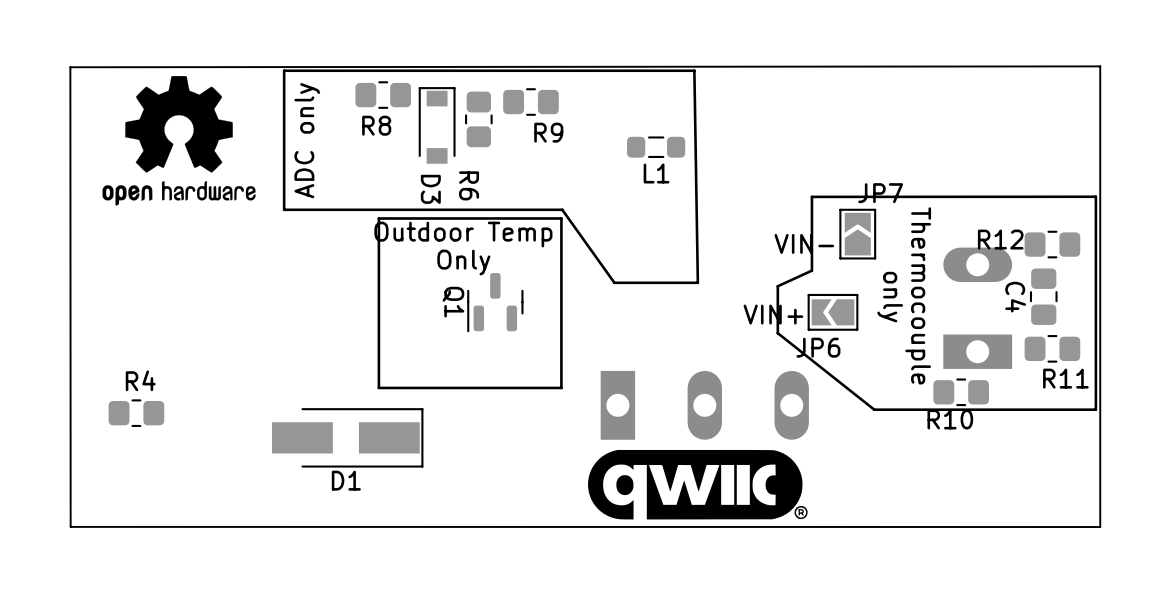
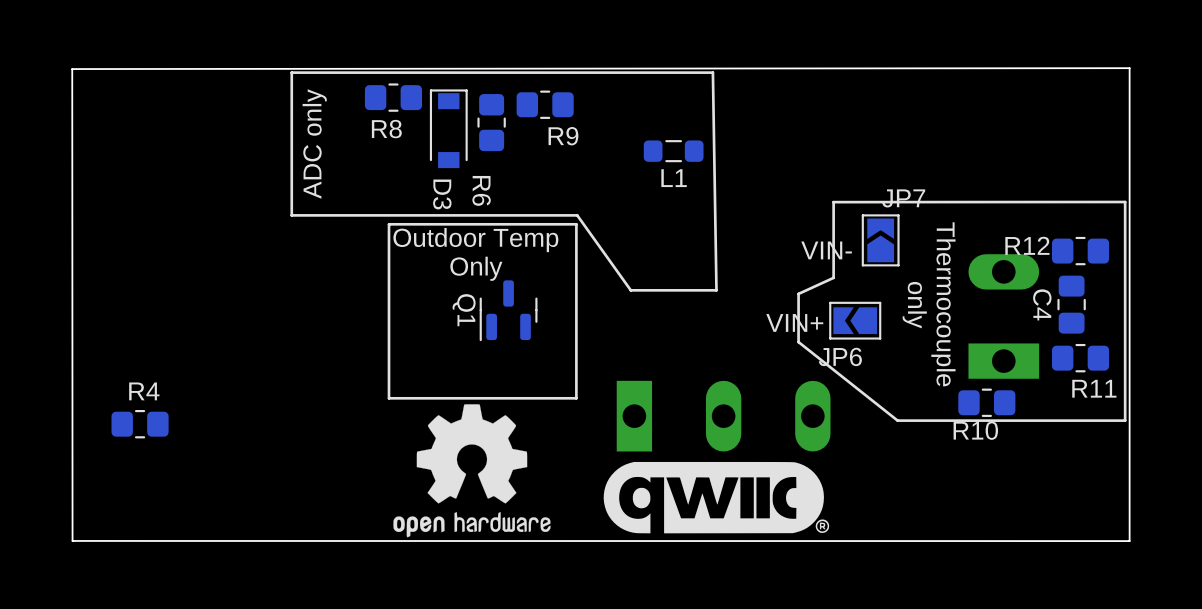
drawing position: (179, 140) -> (471, 470)
D1: (347, 437) -> none

